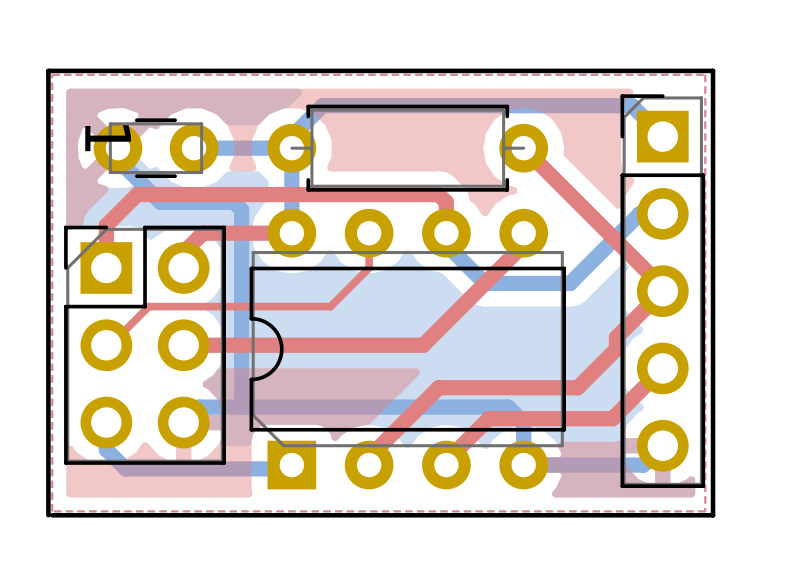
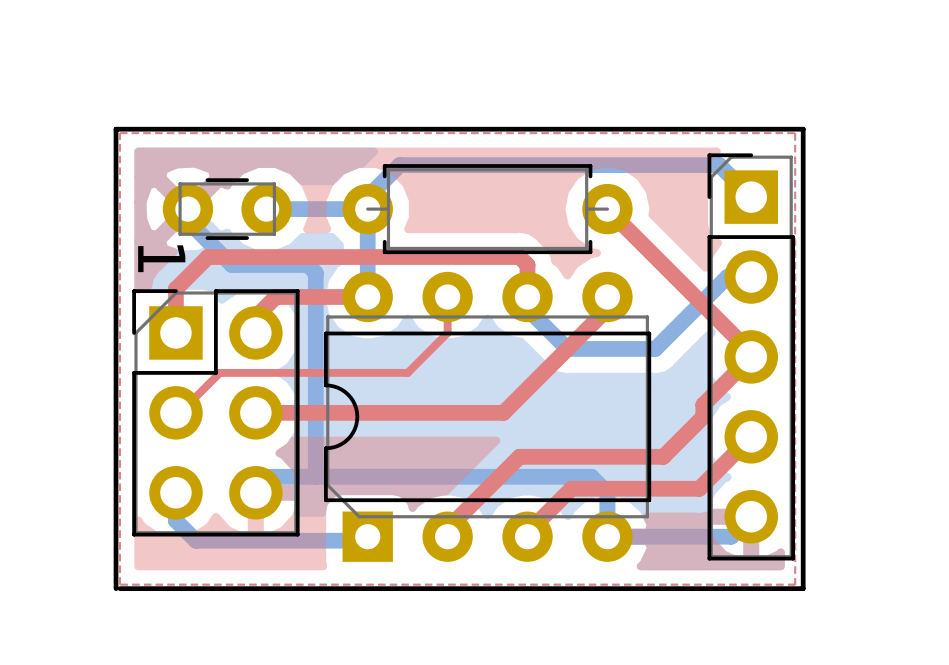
text position: 1 (108, 138) -> 1 (161, 258)

